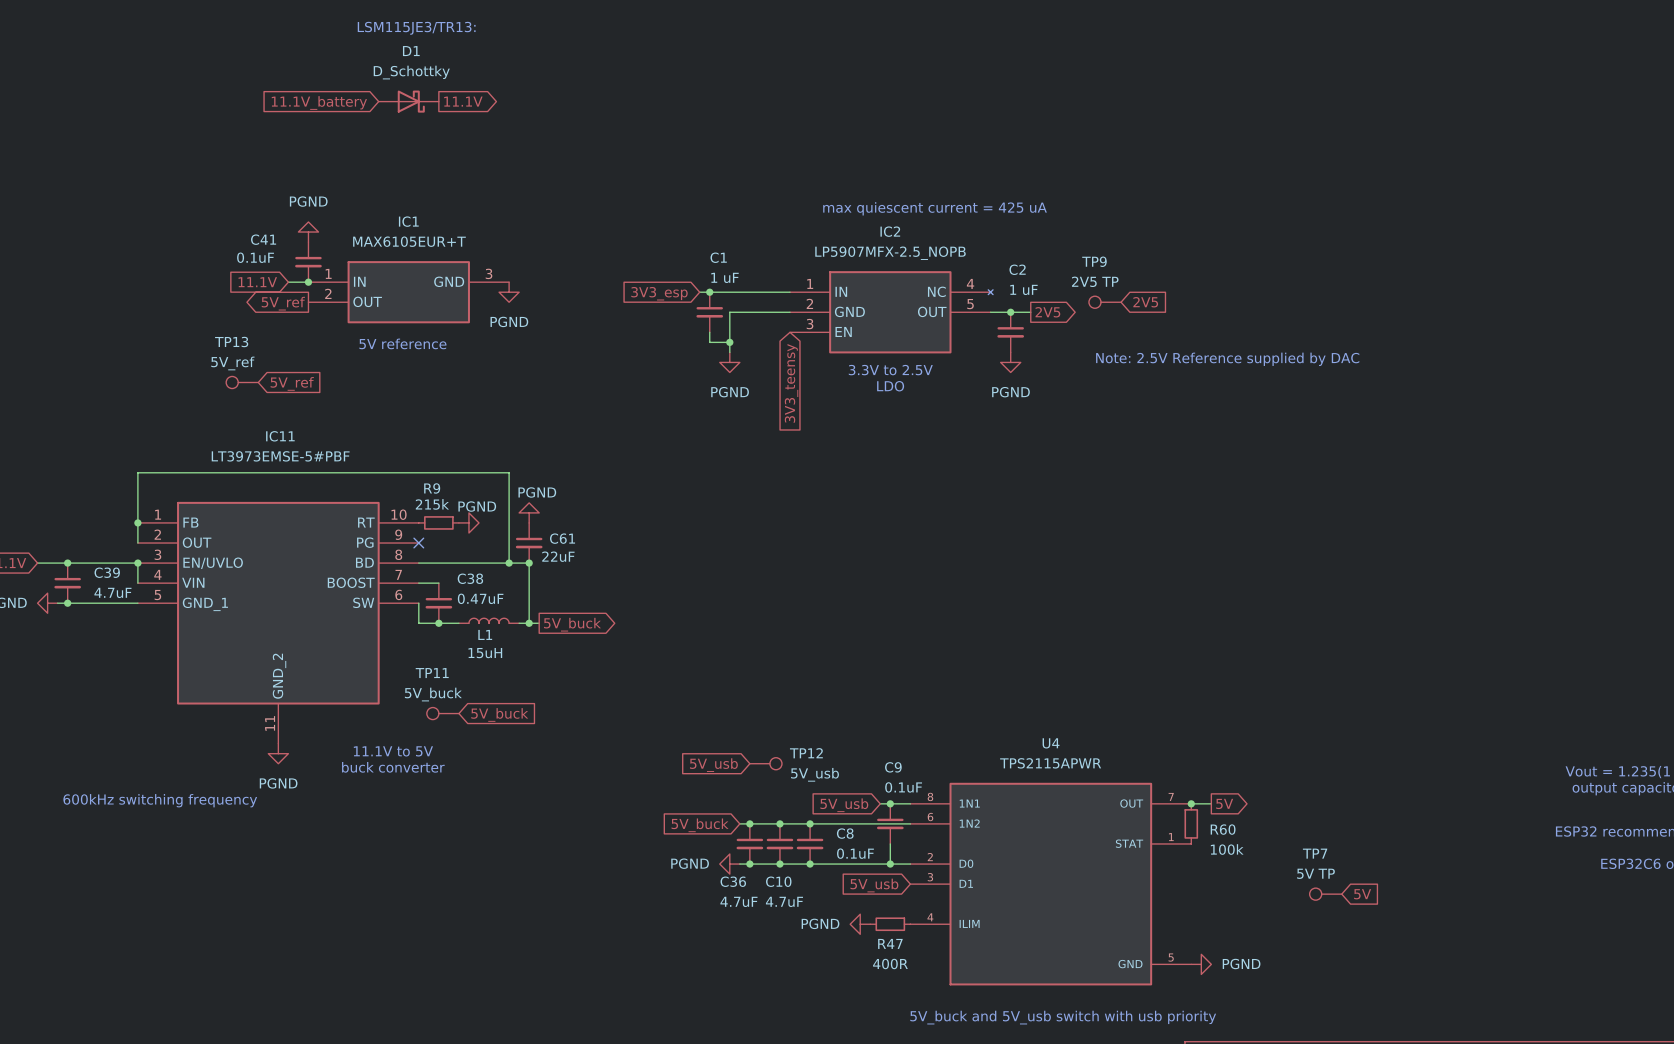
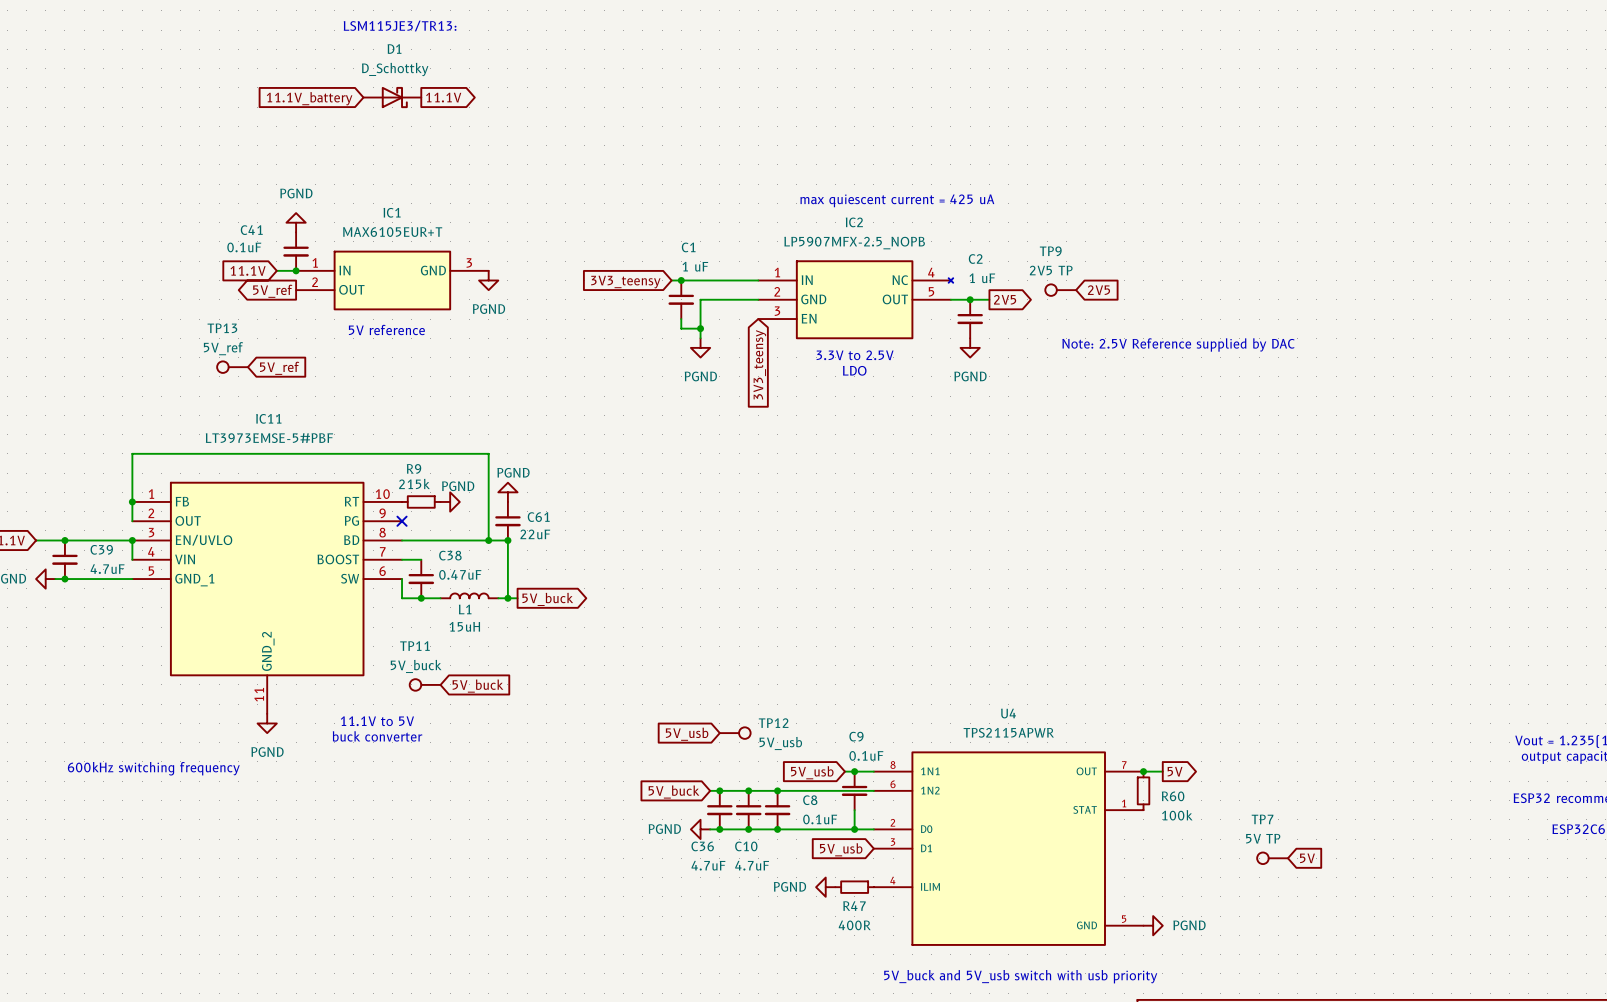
global label: 3V3_esp (659, 293) -> 3V3_teensy (625, 282)

